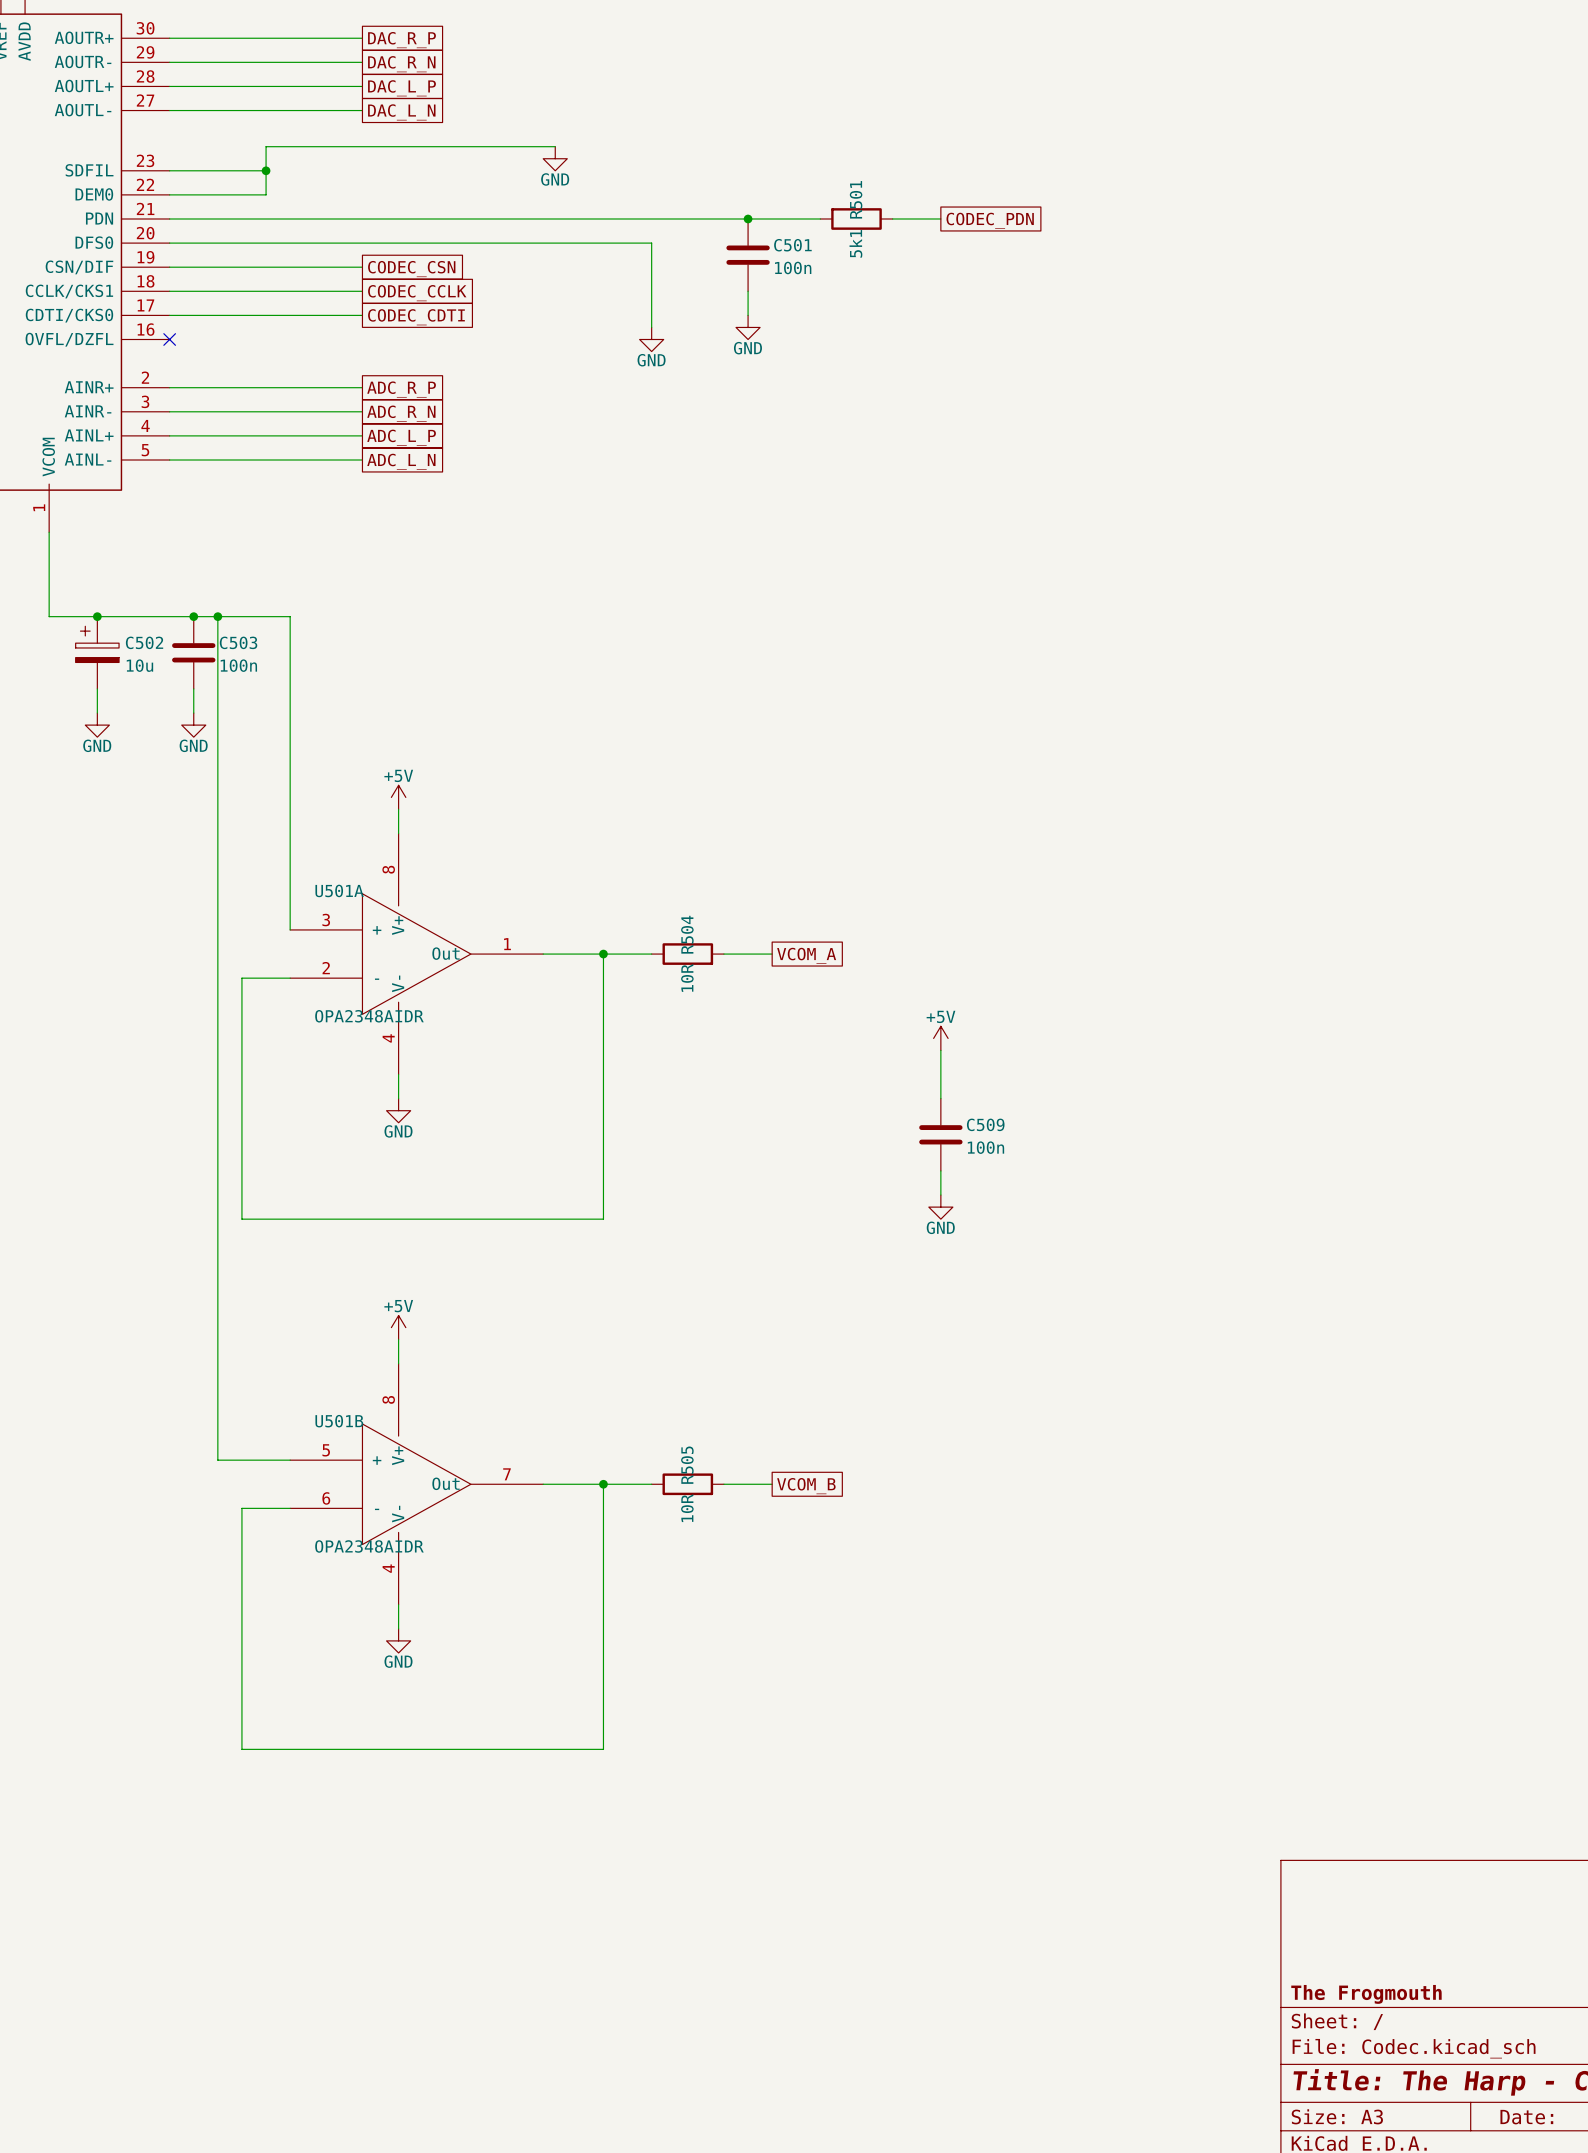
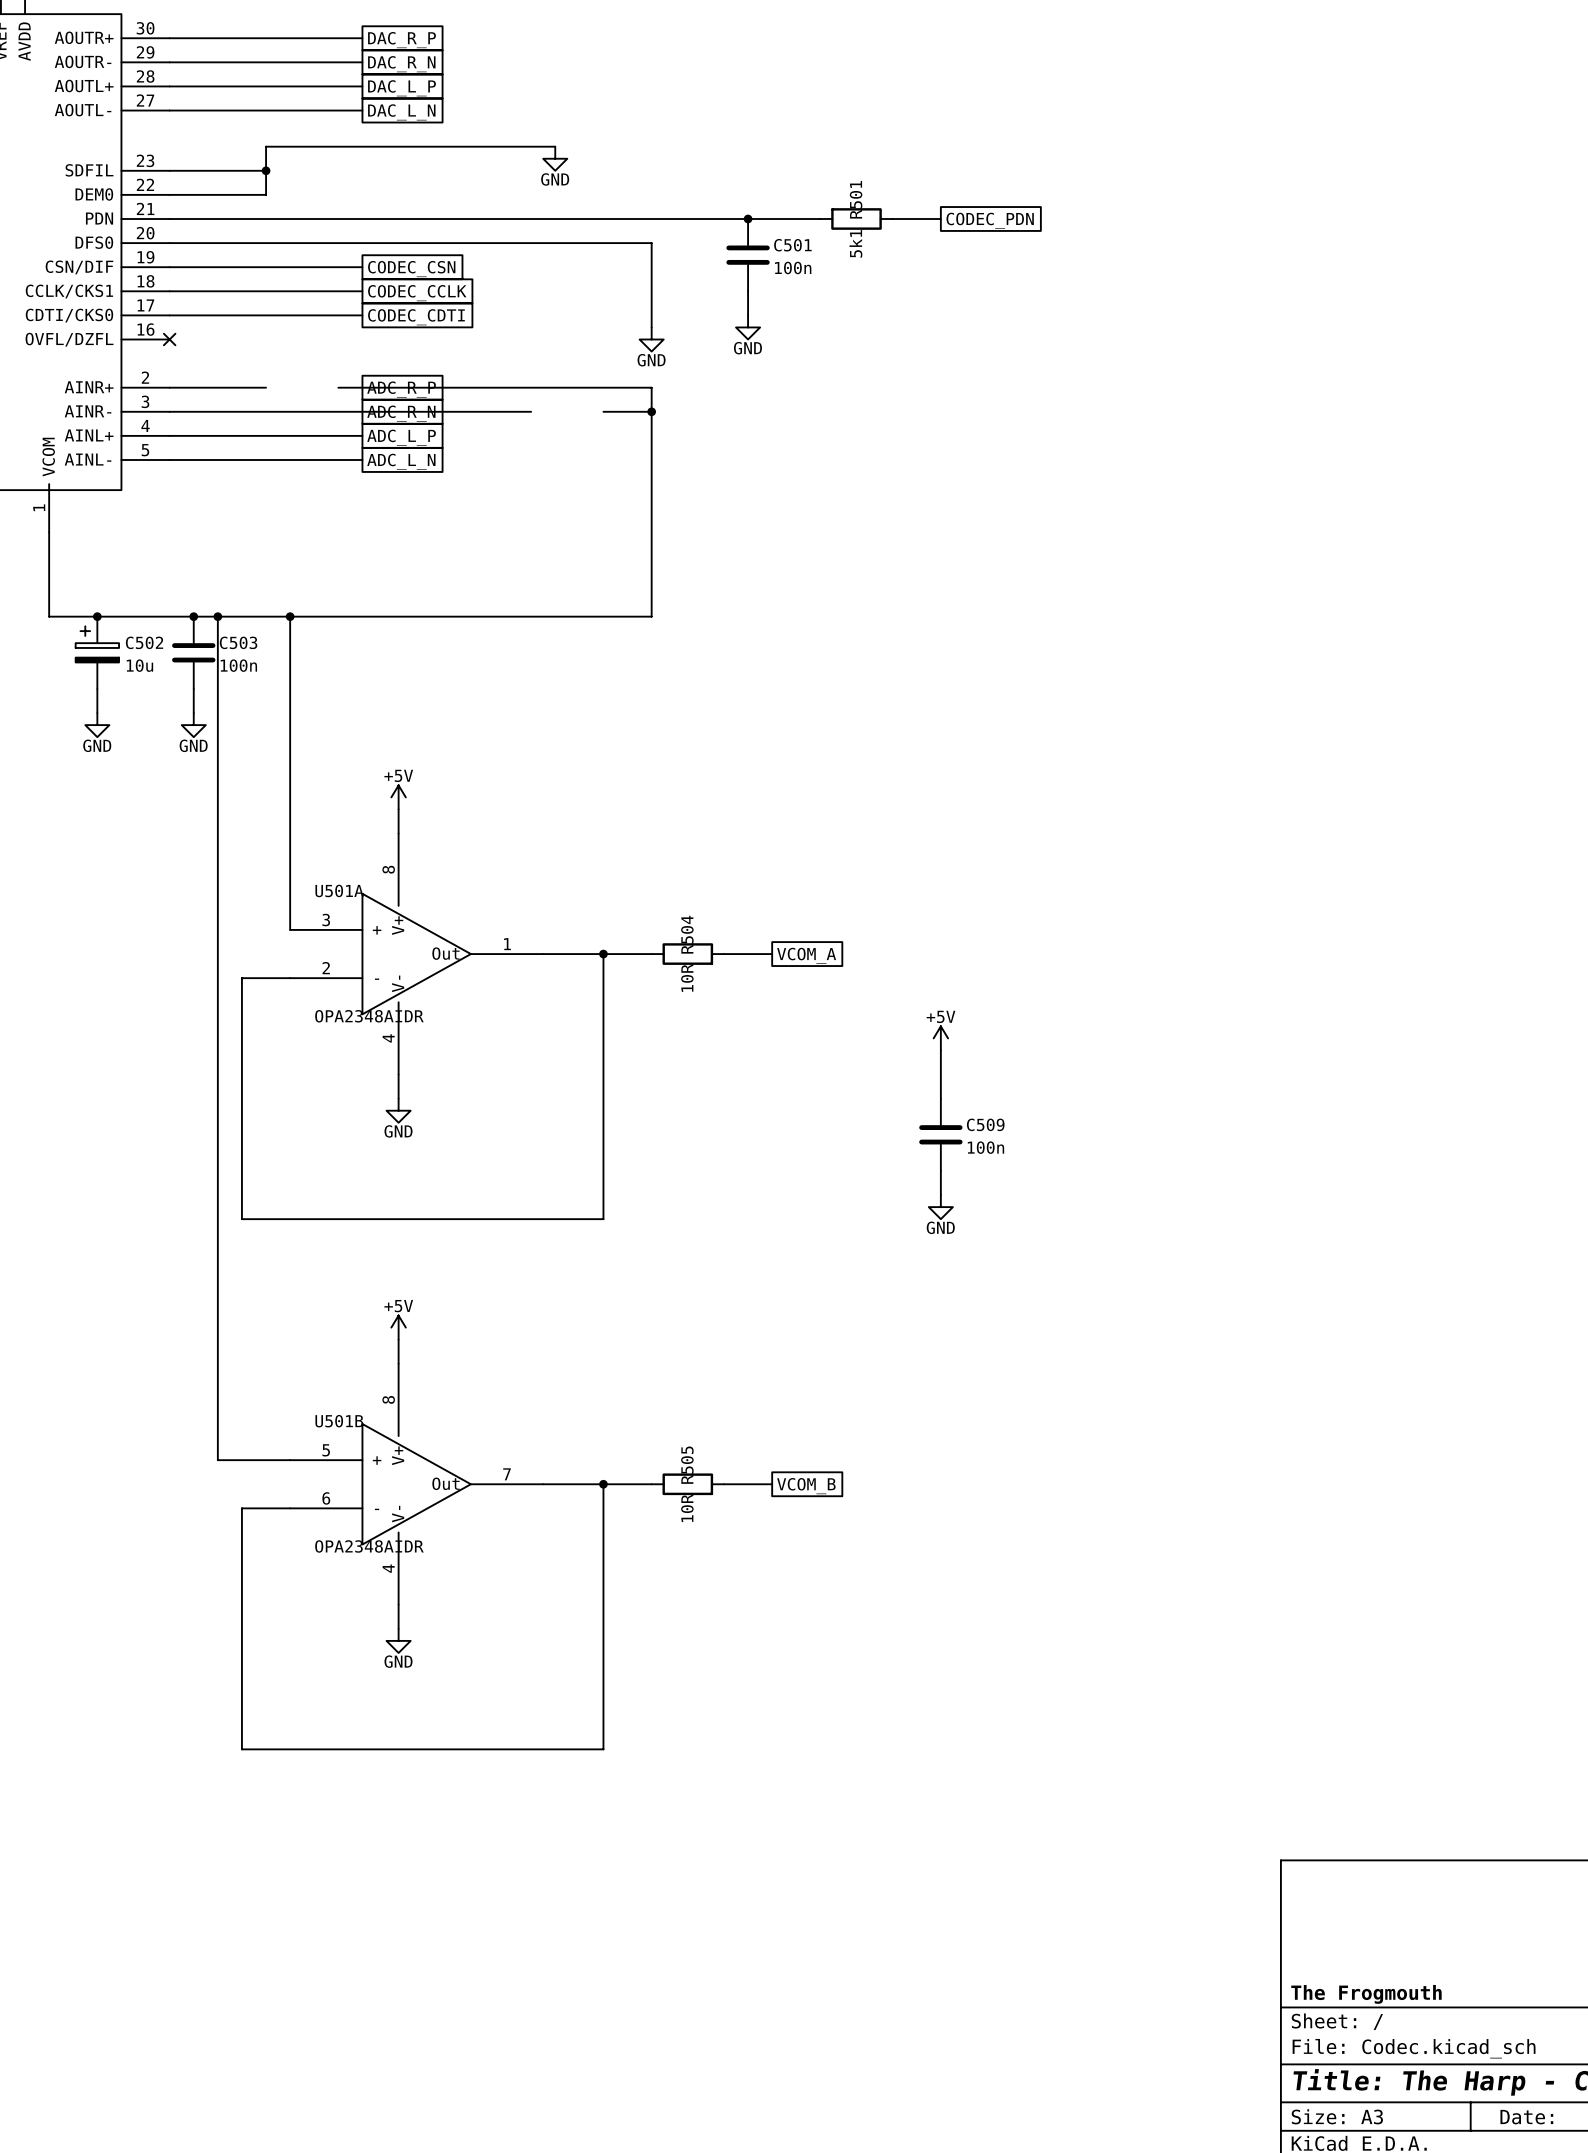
wire: (266, 387) (338, 387) -> none
wire: none -> (362, 387) (651, 387) (651, 616) (290, 616)
wire: none -> (362, 411) (531, 411)
wire: none -> (603, 411) (651, 411)
junction: none -> (651, 411)
junction: none -> (290, 616)

